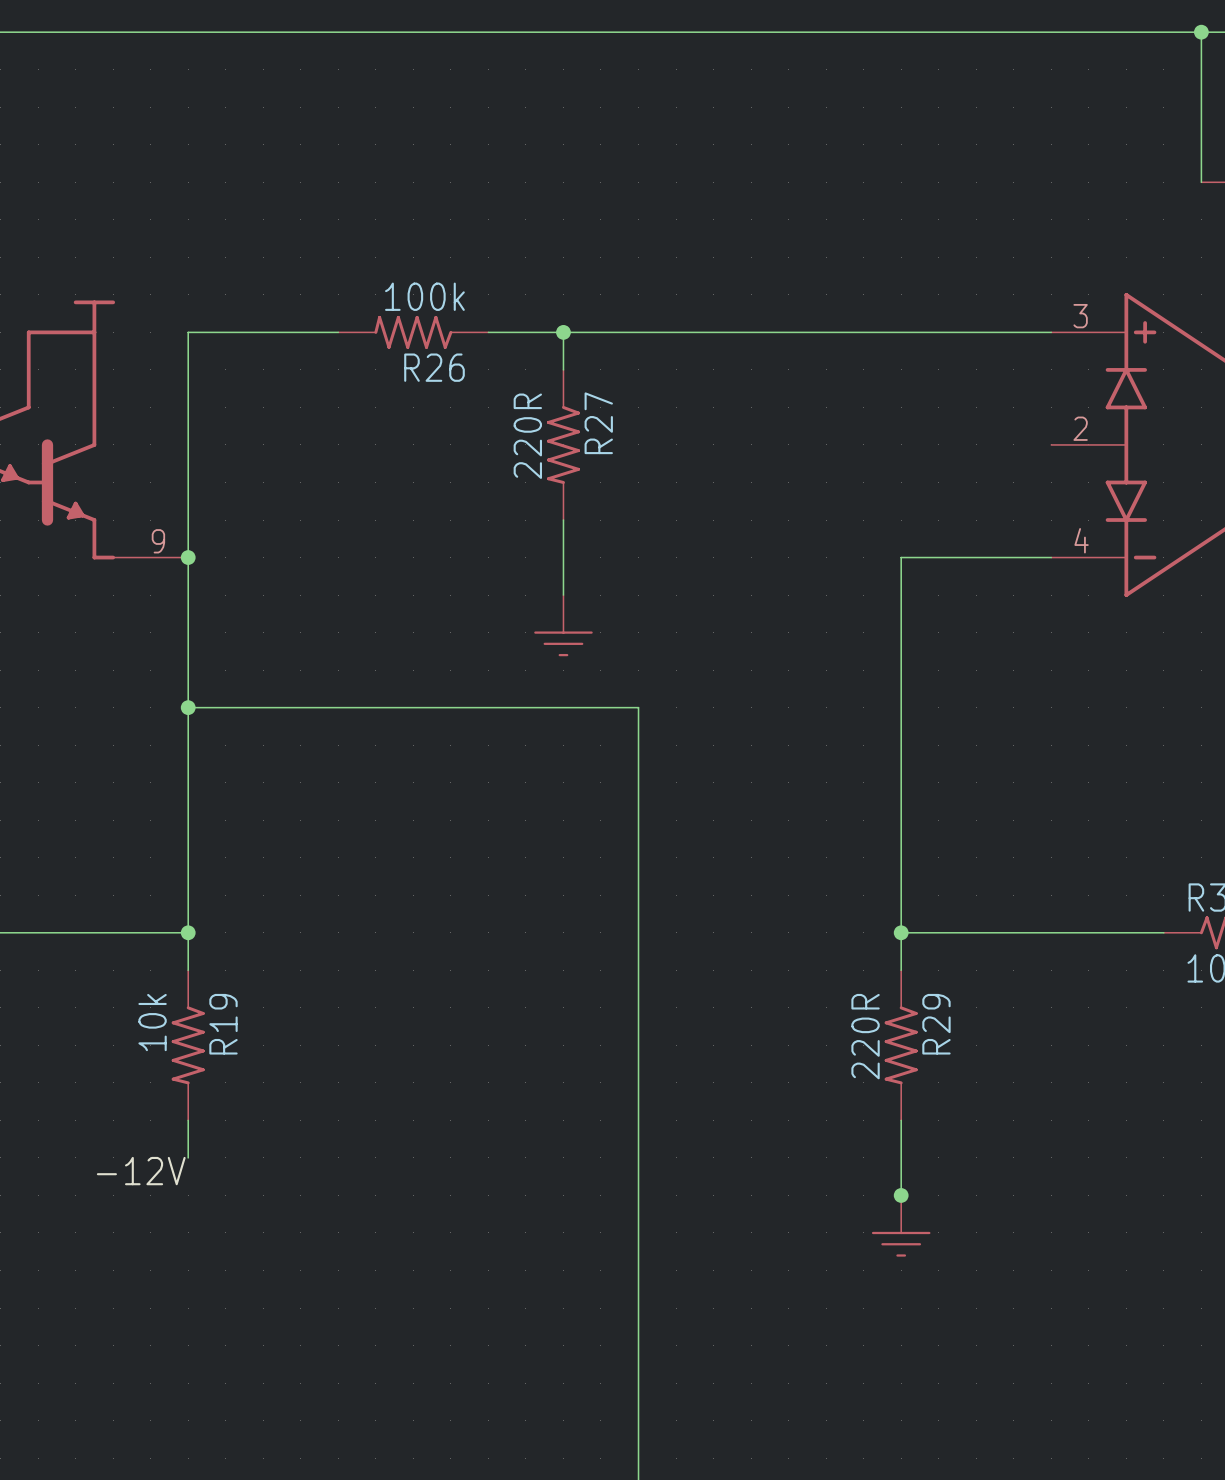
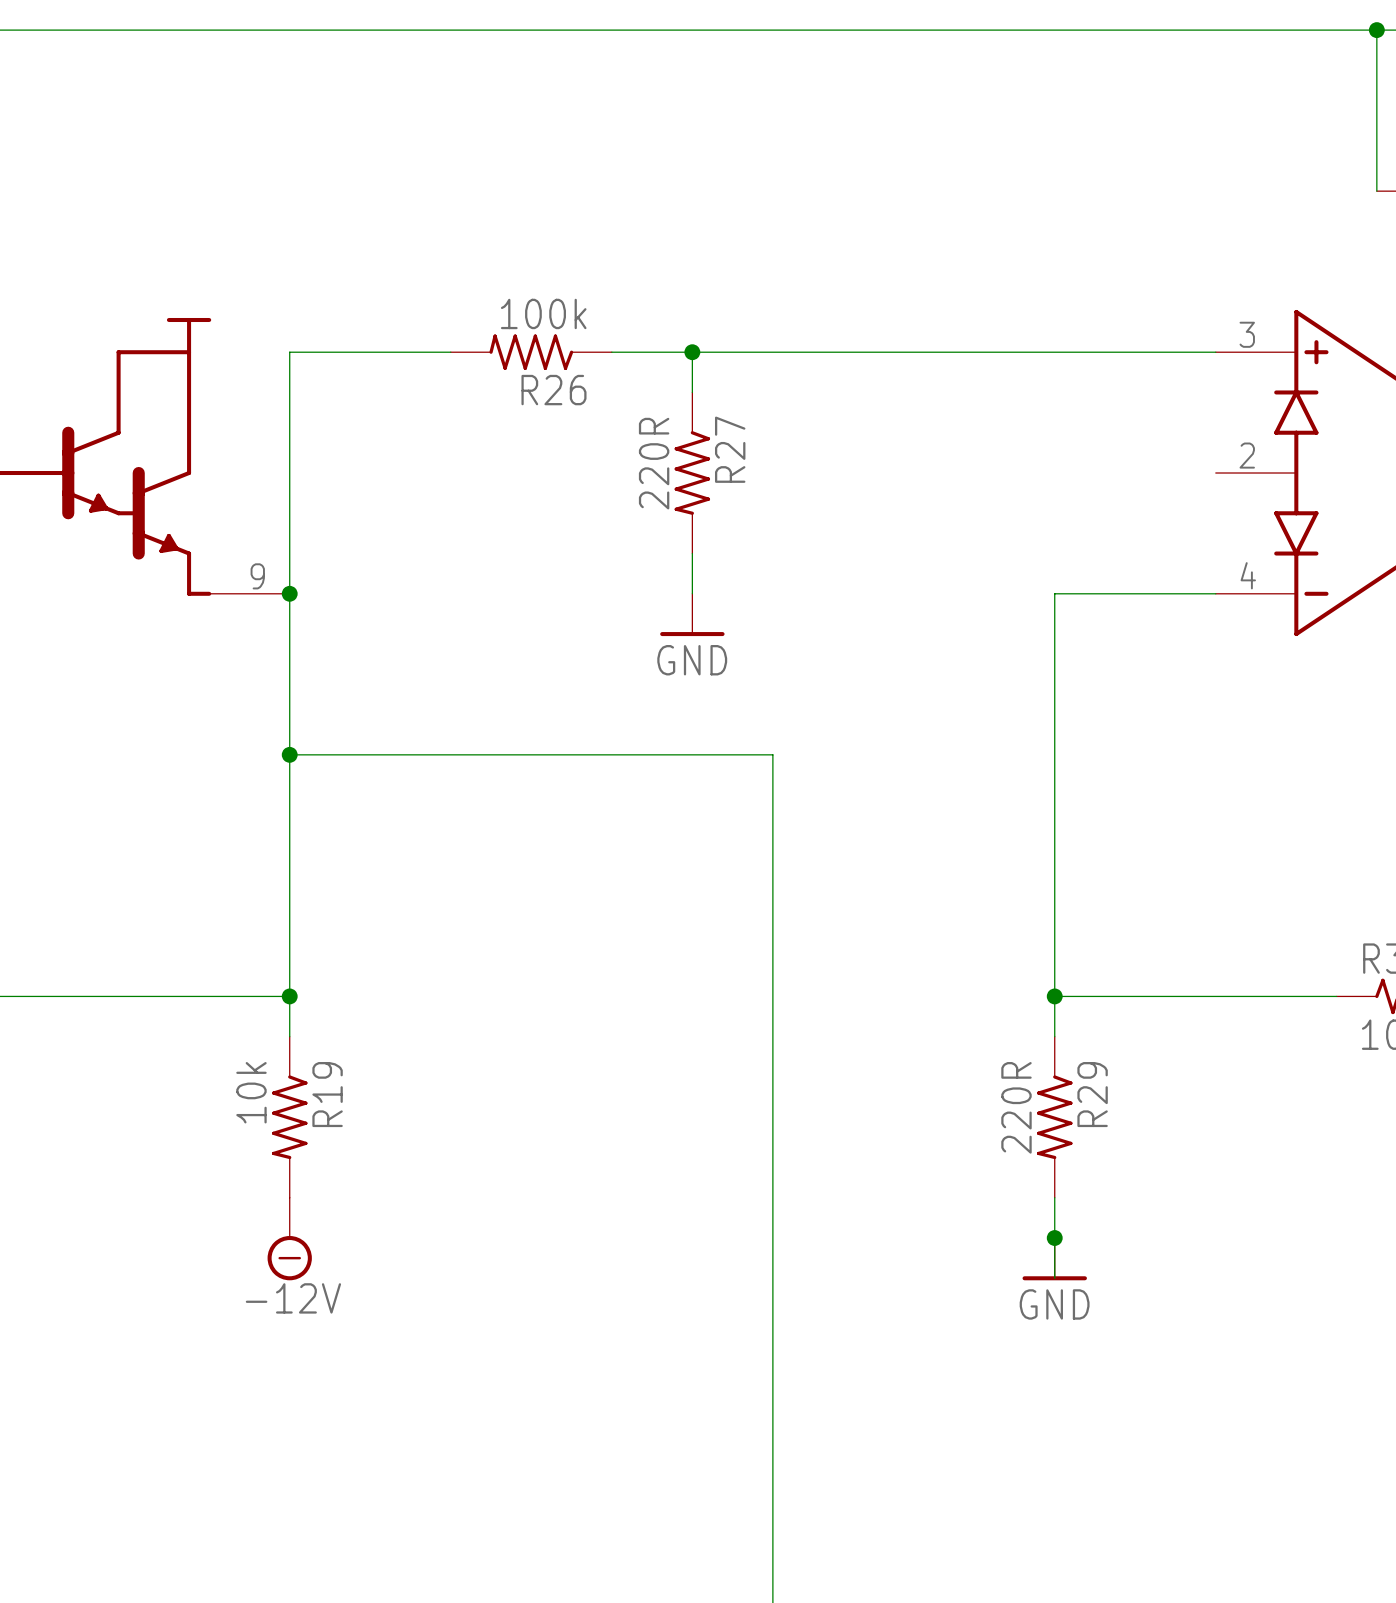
power symbol: none -> GND (692, 614)
power symbol: (563, 625) -> none
power symbol: none -> -12V (289, 1239)
label: -12V (141, 1171) -> none
power symbol: none -> GND (1054, 1259)
junction position: (901, 1195) -> (1054, 1238)
power symbol: (901, 1226) -> none

